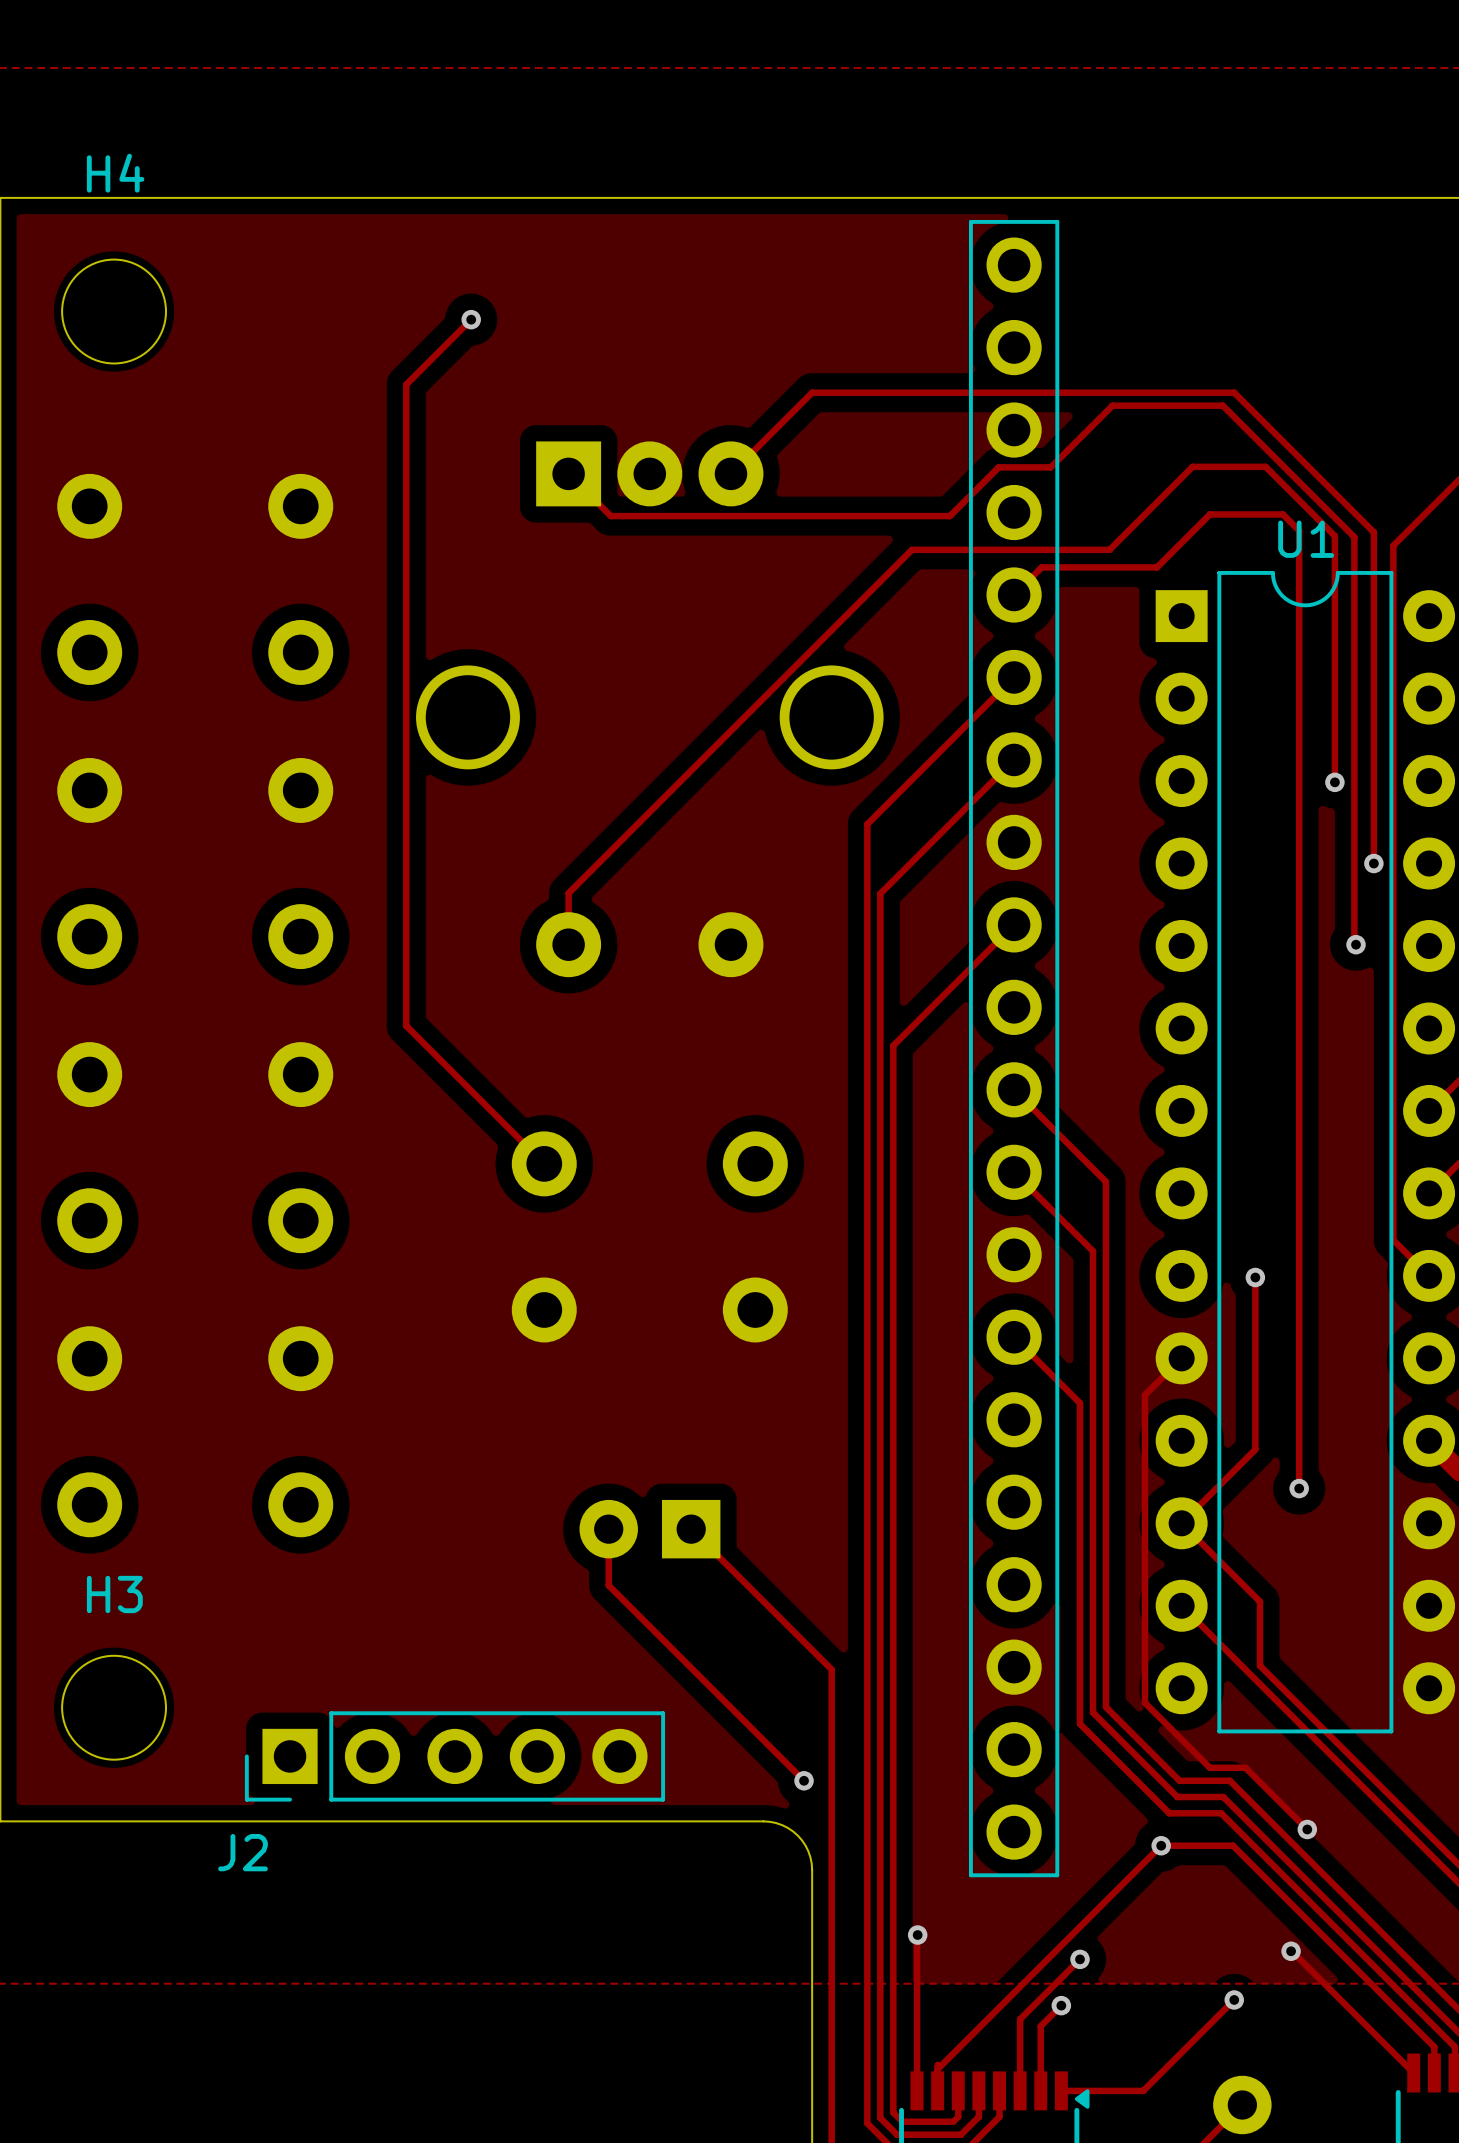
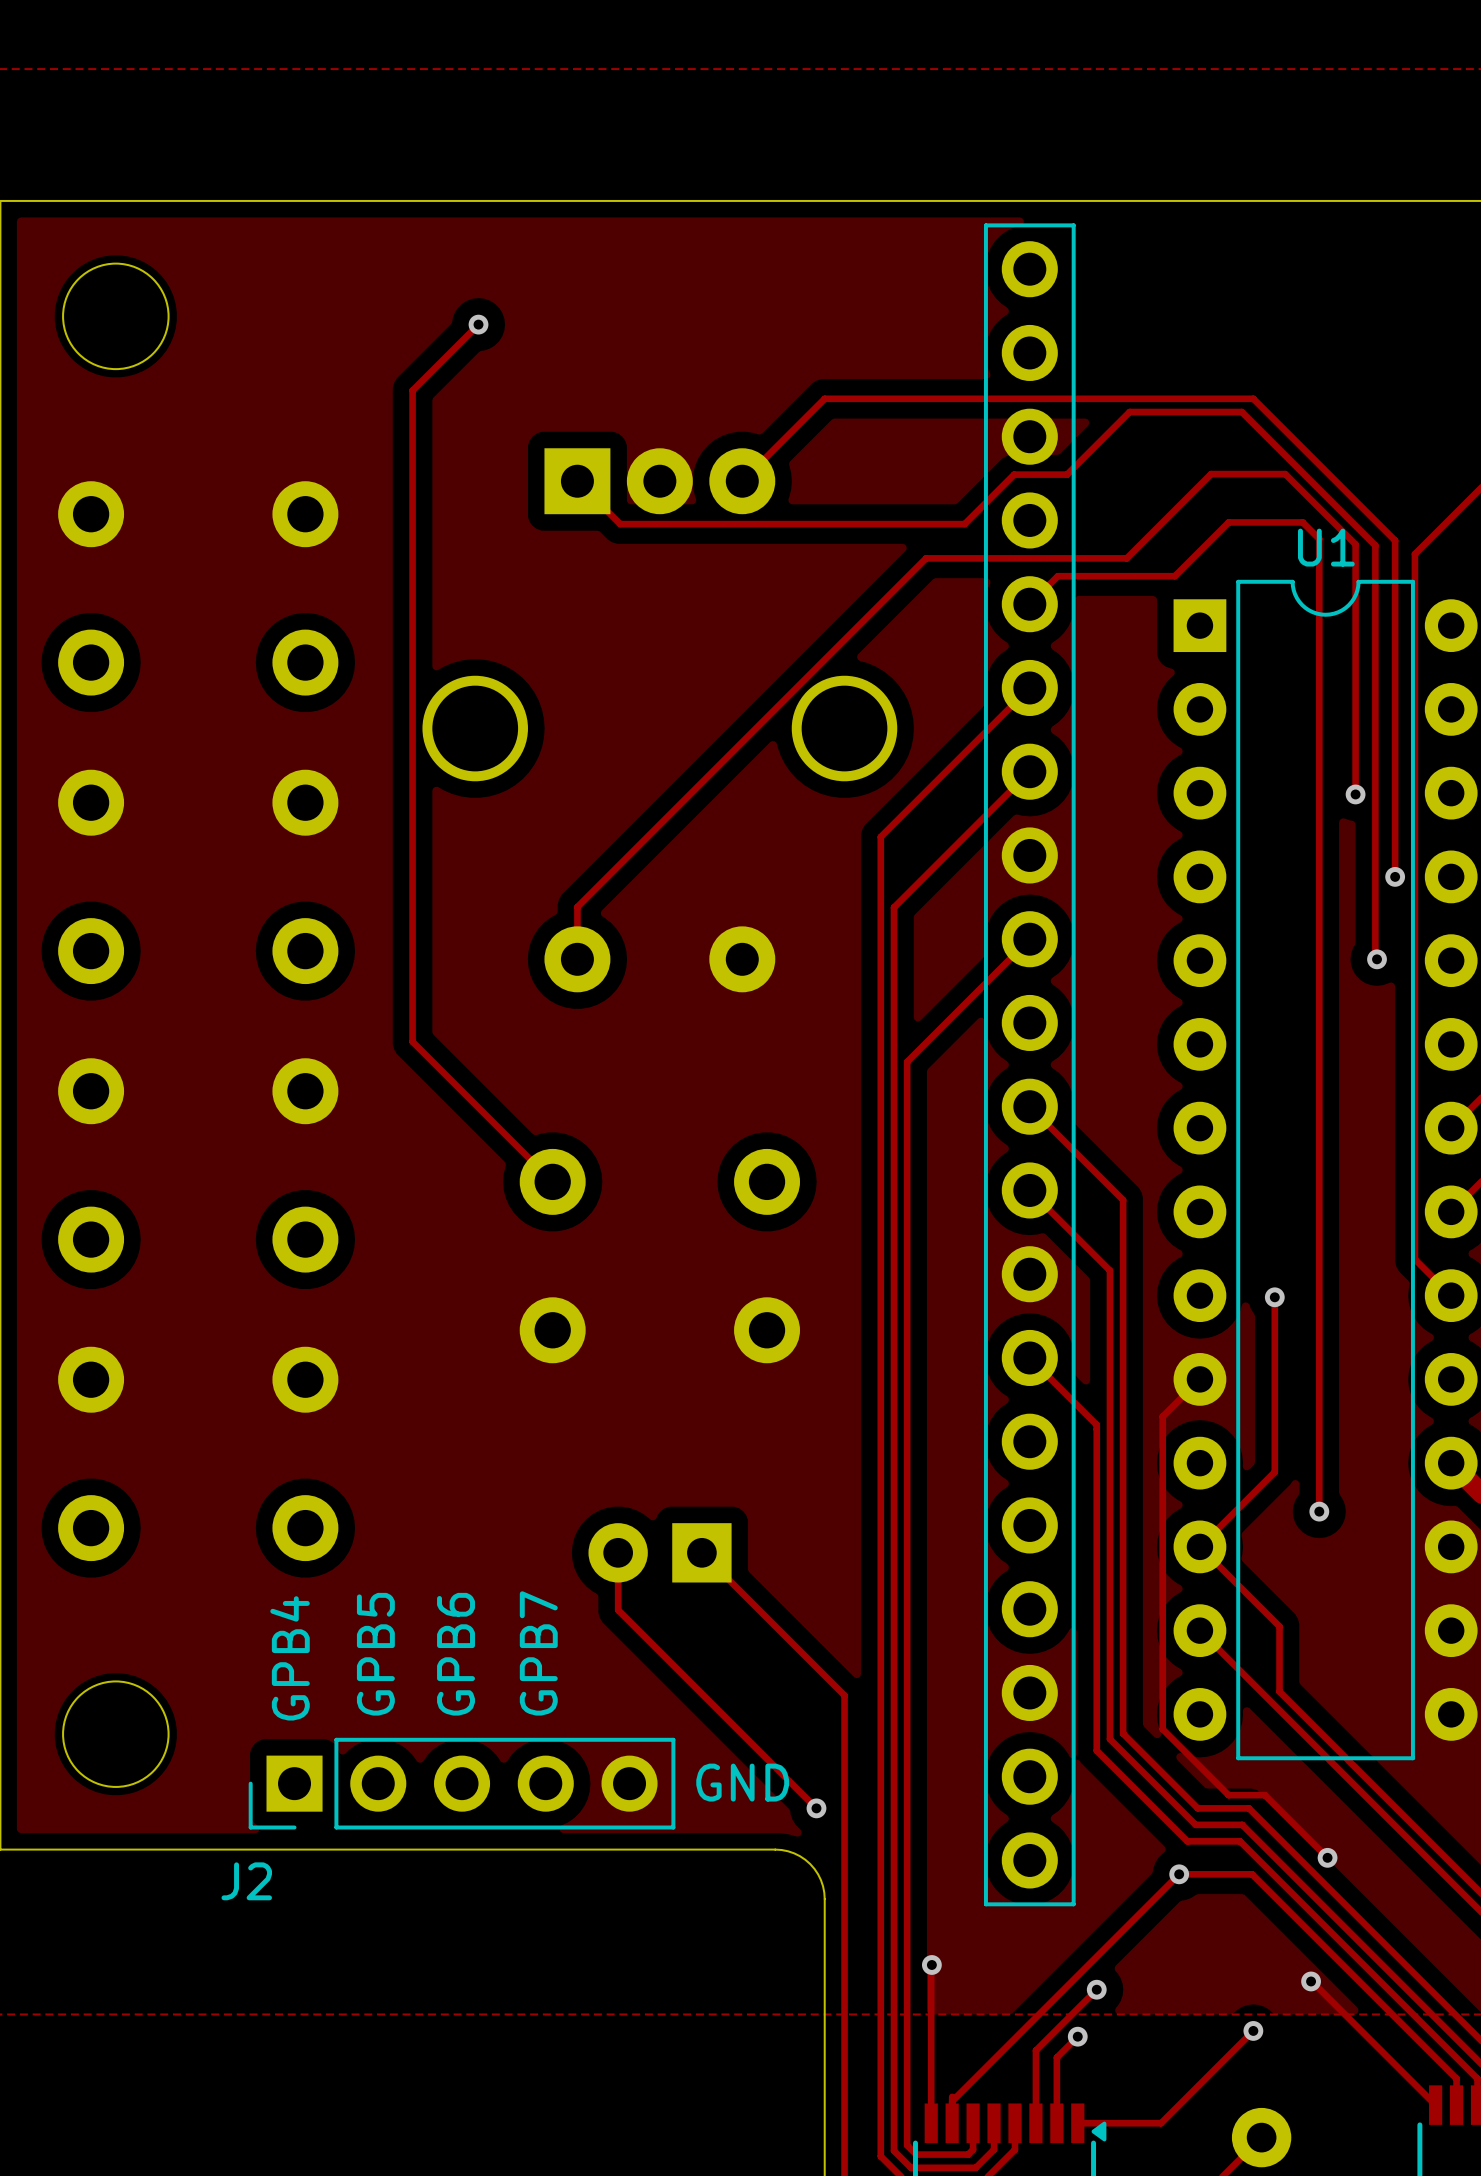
H4 name: H4 (115, 173) -> none
H3 name: H3 (114, 1594) -> none
text: none -> GPB7 (538, 1653)
text: none -> GPB5 (375, 1654)
text: none -> GPB6 (456, 1654)
text: none -> GPB4 (290, 1658)
text: none -> GND (742, 1782)

